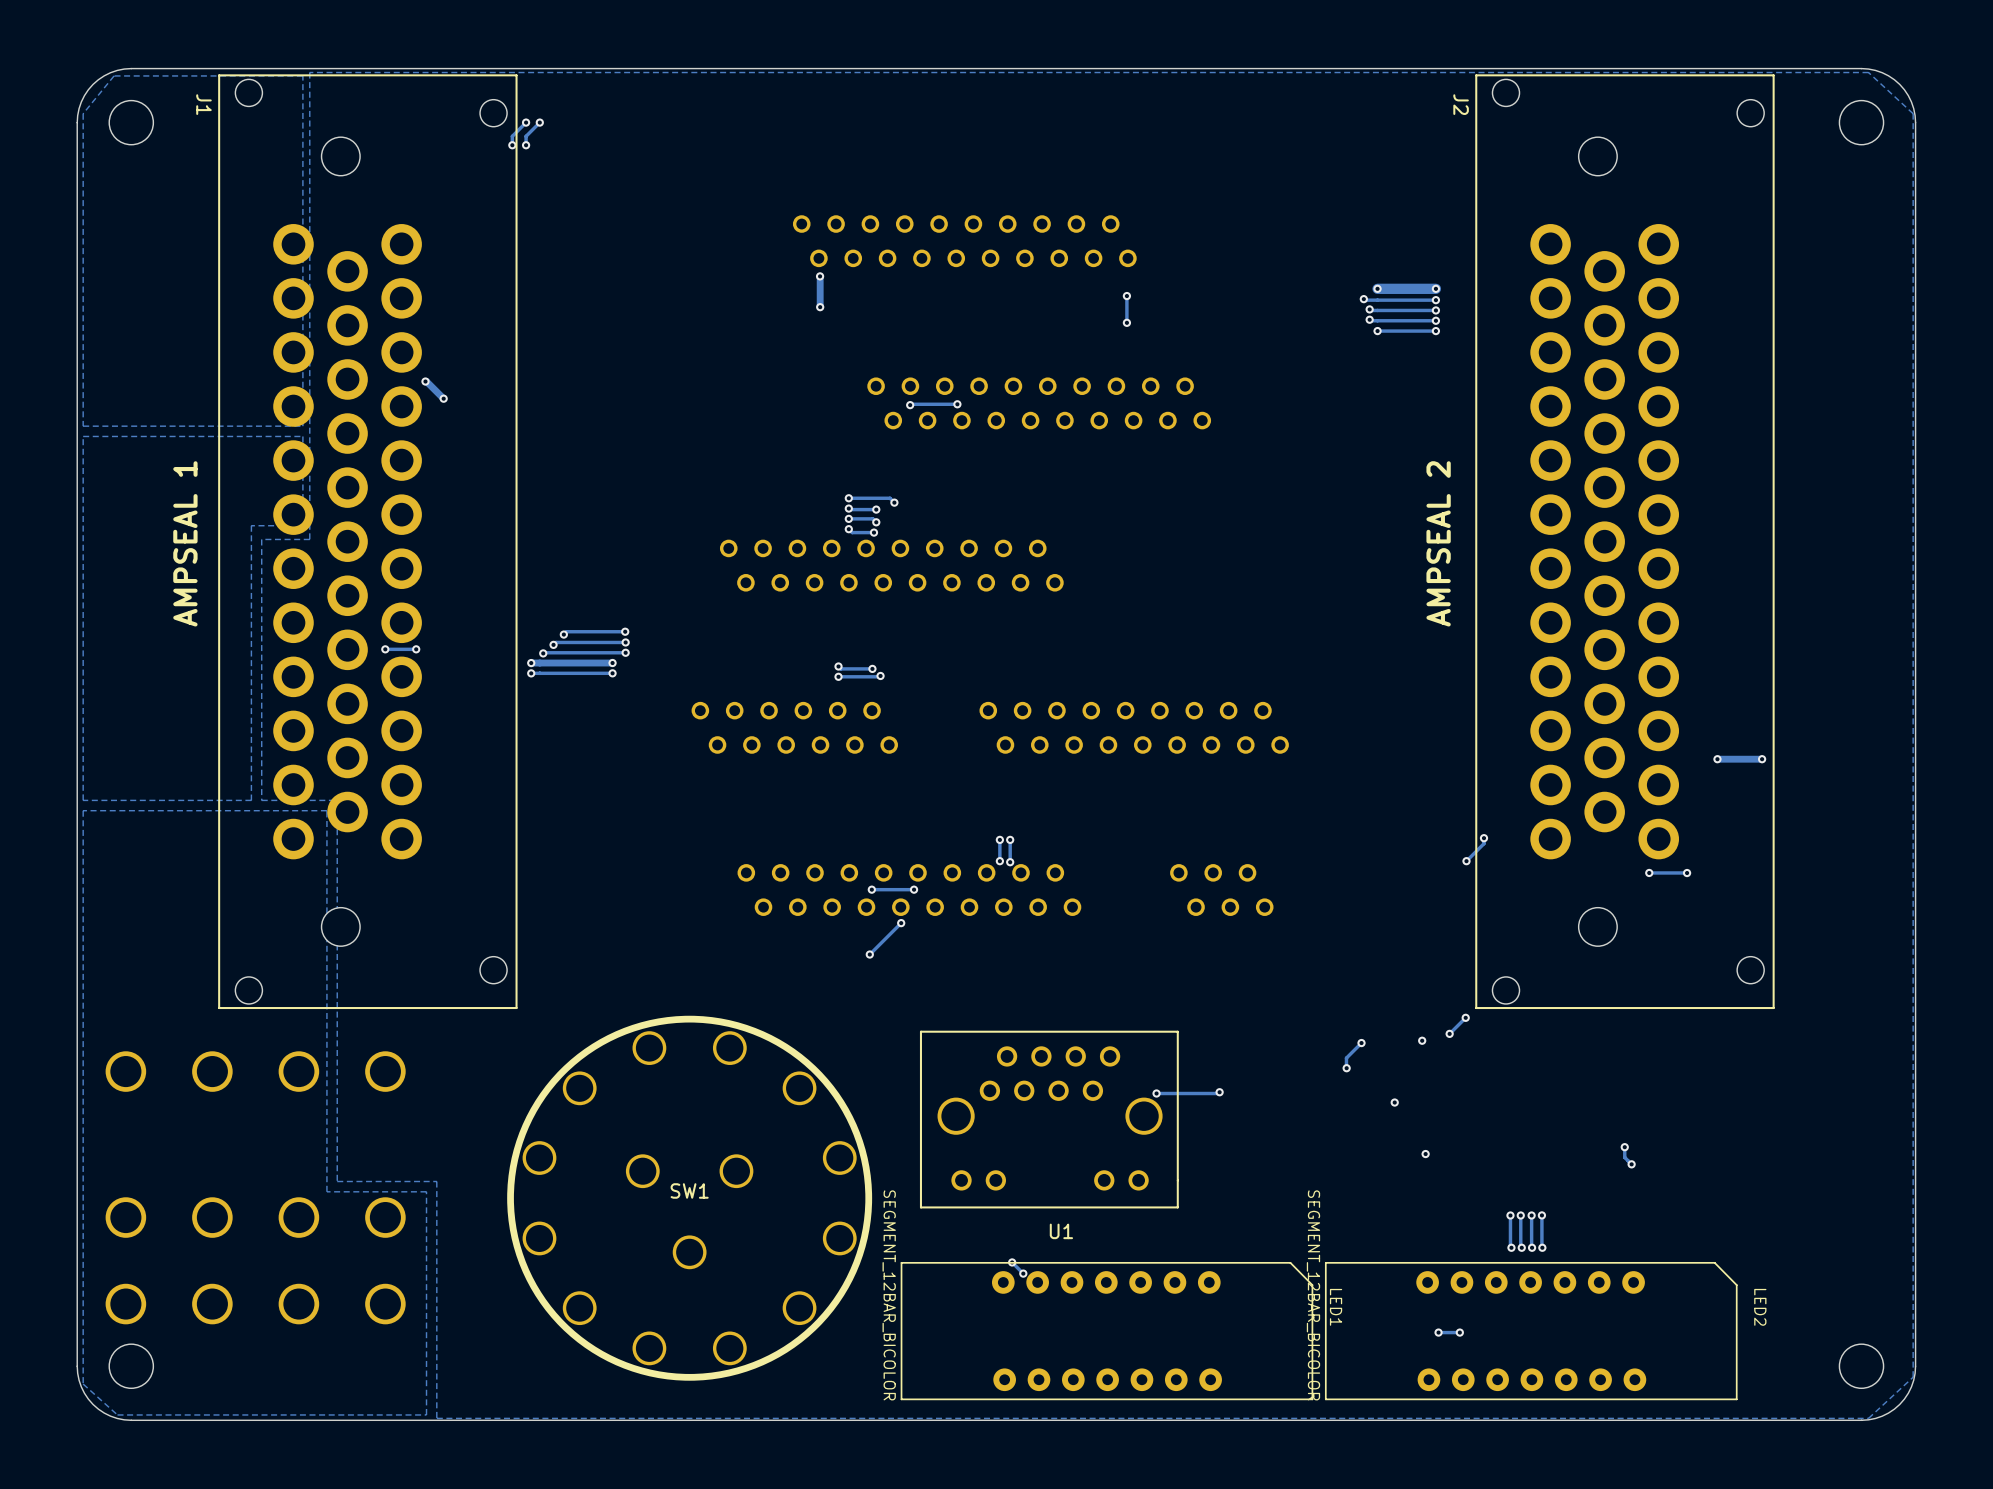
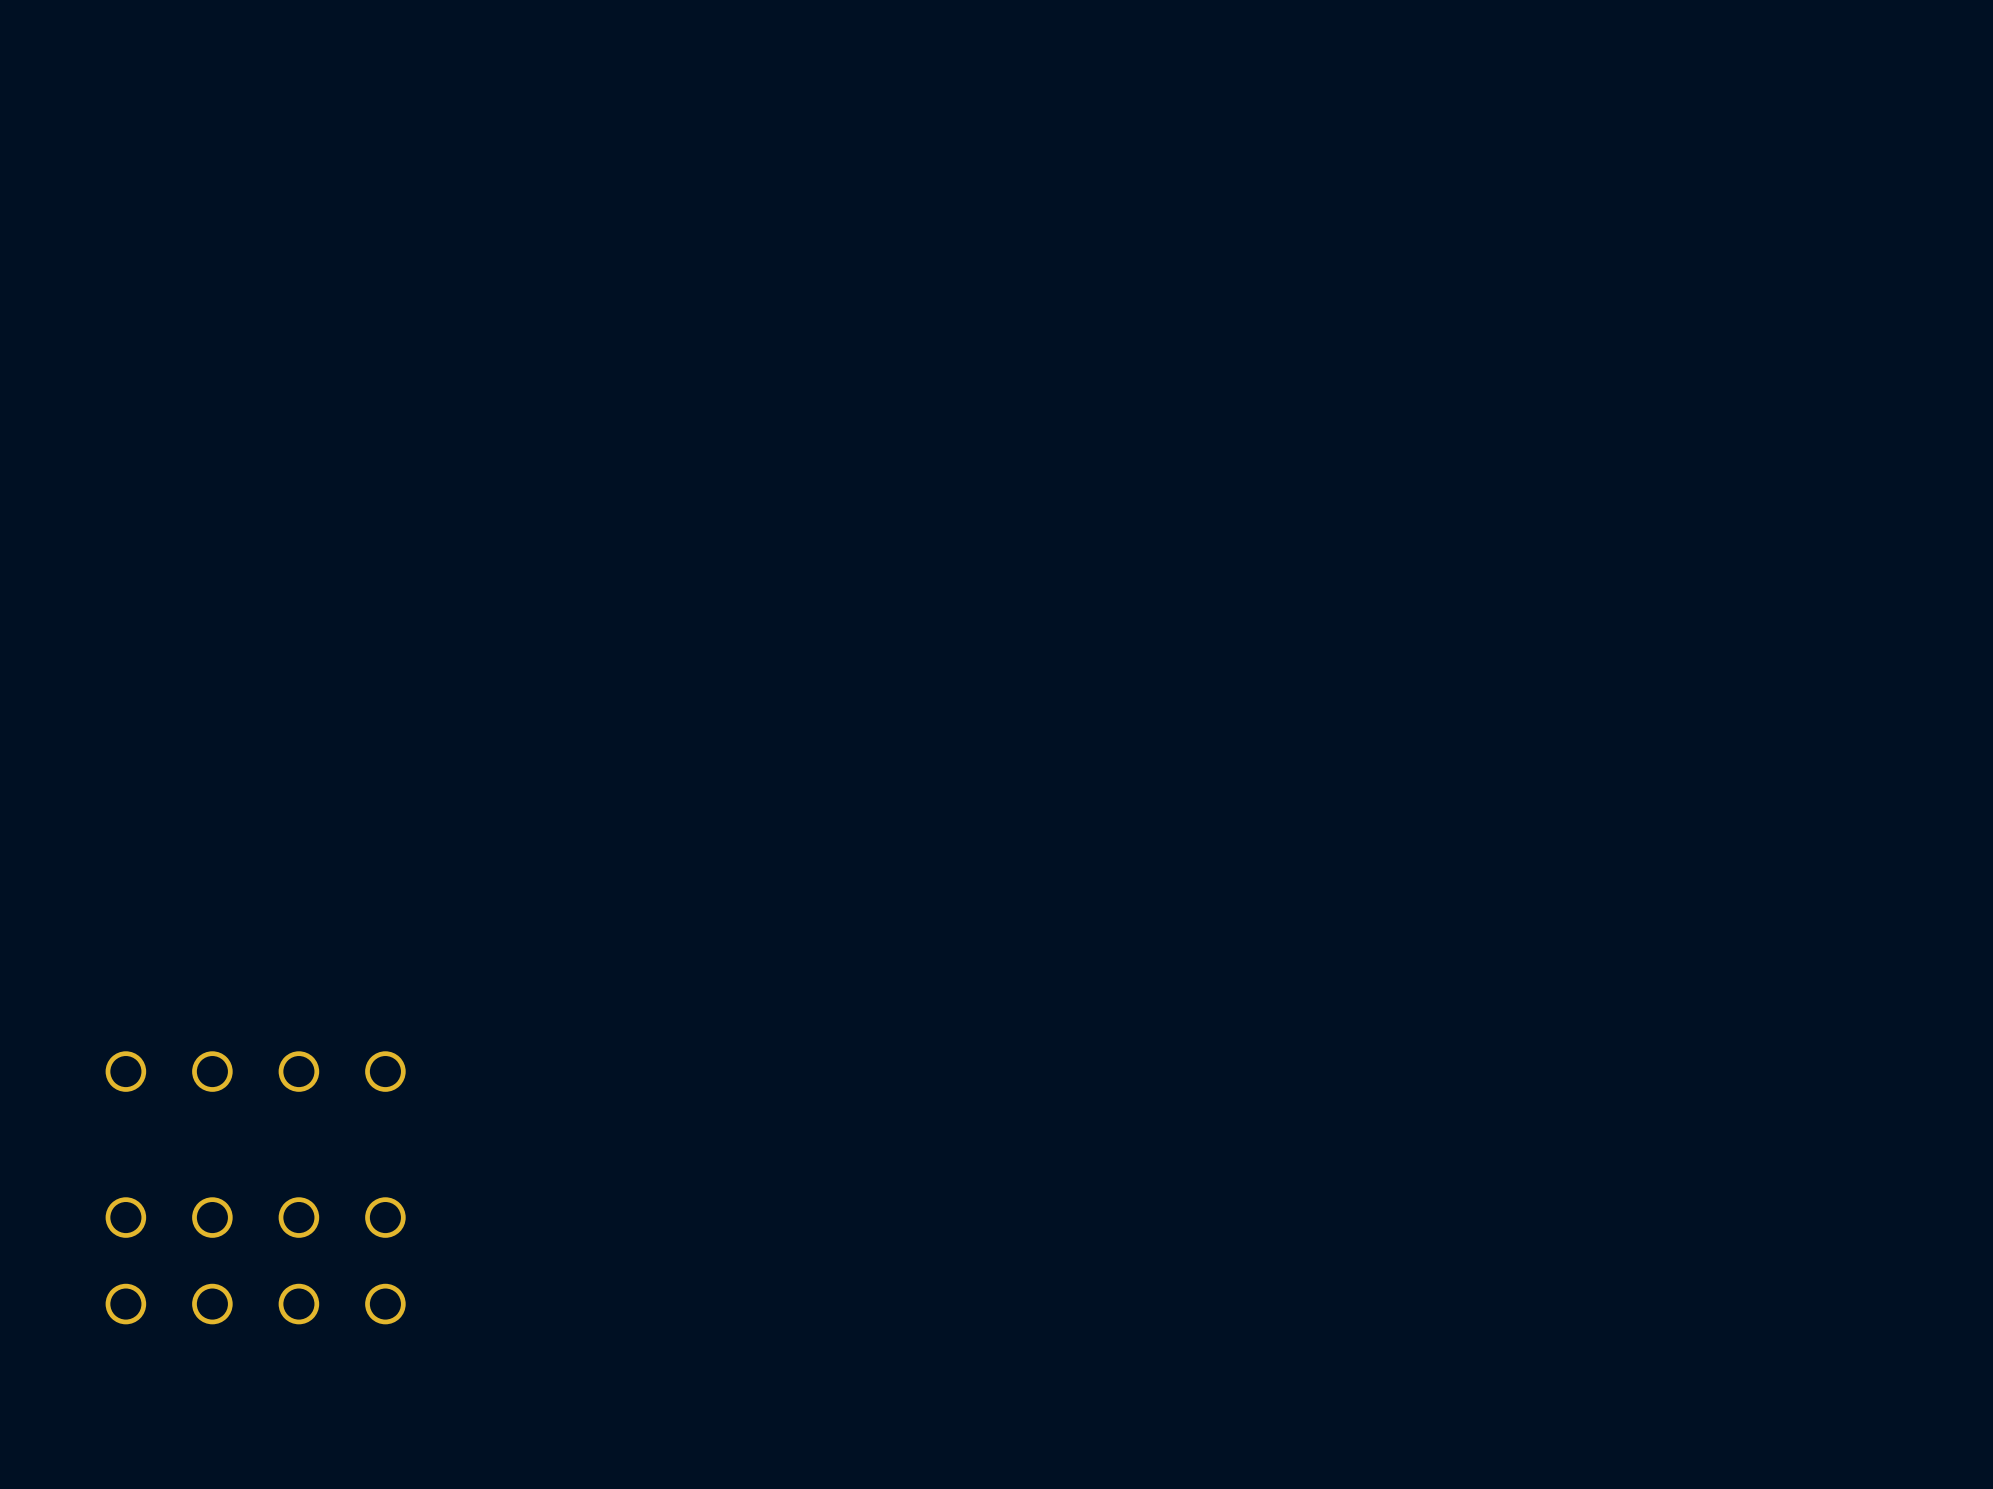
board edge: (1861, 68) (131, 68) (110, 72) (98, 79) (84, 95) (79, 108) (77, 122) (77, 1366) (81, 1386) (88, 1399) (104, 1413) (117, 1418) (131, 1420) (1861, 1420) (1882, 1416) (1894, 1409) (1904, 1399) (1911, 1386) (1915, 1366) (1915, 122) (1911, 101) (1899, 84) (1882, 72) (1861, 68) -> none
zone outline: (1868, 72) (309, 72) (309, 539) (261, 539) (261, 800) (337, 800) (337, 1181) (436, 1181) (436, 1418) (1868, 1418) (1913, 1377) (1913, 113) (1868, 72) -> none
zone outline: (302, 75) (302, 426) (83, 426) (83, 113) (114, 75) (302, 75) -> none
round board edge: [108, 99, 155, 146] -> none
round board edge: [1838, 99, 1885, 146] -> none
track: (526, 122) (512, 136) (512, 145) -> none
via: (526, 122) -> none
track: (539, 122) (526, 136) (526, 145) -> none
via: (539, 122) -> none
via: (512, 145) -> none
via: (526, 145) -> none
part: (964, 241) -> none
track: (820, 276) (820, 307) -> none
via: (820, 276) -> none
via: (1377, 288) -> none
track: (1435, 288) (1377, 288) -> none
via: (1435, 288) -> none
track: (1126, 296) (1126, 322) -> none
via: (1126, 296) -> none
track: (1363, 299) (1435, 300) -> none
via: (1363, 299) -> none
via: (1435, 300) -> none
via: (820, 307) -> none
track: (1369, 309) (1435, 310) -> none
via: (1369, 309) -> none
via: (1435, 310) -> none
track: (1369, 319) (1435, 320) -> none
via: (1369, 319) -> none
via: (1435, 320) -> none
via: (1126, 322) -> none
via: (1377, 331) -> none
track: (1435, 331) (1377, 331) -> none
via: (1435, 331) -> none
track: (425, 381) (443, 398) -> none
via: (425, 381) -> none
via: (443, 398) -> none
part: (1039, 403) -> none
track: (957, 404) (910, 405) -> none
via: (957, 404) -> none
via: (910, 405) -> none
zone outline: (302, 436) (83, 436) (83, 800) (251, 800) (251, 525) (302, 525) (302, 436) -> none
track: (848, 498) (890, 498) (894, 502) -> none
via: (848, 498) -> none
via: (894, 502) -> none
track: (848, 508) (876, 509) -> none
via: (848, 508) -> none
via: (876, 509) -> none
track: (848, 518) (872, 518) (876, 522) -> none
via: (848, 518) -> none
via: (876, 522) -> none
track: (848, 529) (852, 532) (873, 532) -> none
via: (848, 529) -> none
via: (873, 532) -> none
J1: (367, 541) -> none
J2: (1624, 541) -> none
text: AMPSEAL 1 (185, 543) -> none
text: AMPSEAL 2 (1438, 543) -> none
part: (891, 565) -> none
track: (625, 631) (566, 631) (563, 634) -> none
via: (625, 631) -> none
via: (563, 634) -> none
track: (625, 642) (555, 642) (553, 644) -> none
via: (625, 642) -> none
via: (553, 644) -> none
via: (385, 649) -> none
track: (416, 649) (385, 649) -> none
via: (416, 649) -> none
track: (625, 652) (543, 653) -> none
via: (625, 652) -> none
via: (543, 653) -> none
via: (531, 663) -> none
track: (612, 663) (531, 663) -> none
via: (612, 663) -> none
track: (838, 666) (840, 668) (872, 668) -> none
via: (838, 666) -> none
via: (872, 668) -> none
via: (531, 673) -> none
track: (612, 673) (531, 673) -> none
via: (612, 673) -> none
track: (880, 675) (838, 676) -> none
via: (880, 675) -> none
via: (838, 676) -> none
part: (794, 727) -> none
part: (1134, 727) -> none
via: (1717, 759) -> none
track: (1762, 759) (1717, 759) -> none
via: (1762, 759) -> none
zone outline: (326, 810) (83, 810) (83, 1384) (117, 1414) (426, 1414) (426, 1191) (326, 1191) (326, 810) -> none
track: (1483, 838) (1483, 843) (1466, 861) -> none
via: (1483, 838) -> none
track: (999, 839) (999, 861) -> none
via: (999, 839) -> none
track: (1010, 839) (1010, 862) -> none
via: (1010, 839) -> none
via: (999, 861) -> none
via: (1466, 861) -> none
via: (1010, 862) -> none
via: (1649, 872) -> none
track: (1687, 872) (1649, 872) -> none
via: (1687, 873) -> none
via: (871, 889) -> none
track: (914, 889) (871, 889) -> none
via: (914, 889) -> none
part: (909, 890) -> none
part: (1221, 890) -> none
track: (901, 923) (869, 954) -> none
via: (901, 923) -> none
via: (869, 954) -> none
track: (1465, 1017) (1449, 1033) -> none
via: (1465, 1017) -> none
via: (1449, 1033) -> none
via: (1422, 1040) -> none
track: (1361, 1043) (1346, 1058) (1346, 1068) -> none
via: (1361, 1043) -> none
via: (1346, 1068) -> none
track: (1219, 1092) (1156, 1093) -> none
via: (1219, 1092) -> none
via: (1156, 1093) -> none
via: (1394, 1102) -> none
U1: (1049, 1119) -> none
track: (1624, 1147) (1624, 1157) (1631, 1164) -> none
via: (1624, 1147) -> none
via: (1425, 1154) -> none
via: (1631, 1164) -> none
SW1: (689, 1198) -> none
track: (1510, 1215) (1511, 1247) -> none
via: (1510, 1215) -> none
track: (1520, 1215) (1521, 1247) -> none
via: (1520, 1215) -> none
track: (1531, 1215) (1532, 1247) -> none
via: (1531, 1215) -> none
track: (1541, 1215) (1542, 1247) -> none
via: (1541, 1215) -> none
via: (1511, 1247) -> none
via: (1521, 1247) -> none
via: (1532, 1247) -> none
via: (1542, 1247) -> none
track: (1012, 1262) (1023, 1273) -> none
via: (1012, 1262) -> none
via: (1023, 1273) -> none
LED1: SEGMENT_12BAR_BICOLOR (1106, 1331) -> none
LED2: SEGMENT_12BAR_BICOLOR (1531, 1331) -> none
via: (1438, 1332) -> none
track: (1459, 1332) (1438, 1332) -> none
via: (1459, 1332) -> none
round board edge: [108, 1343, 155, 1389] -> none
round board edge: [1838, 1343, 1885, 1389] -> none

